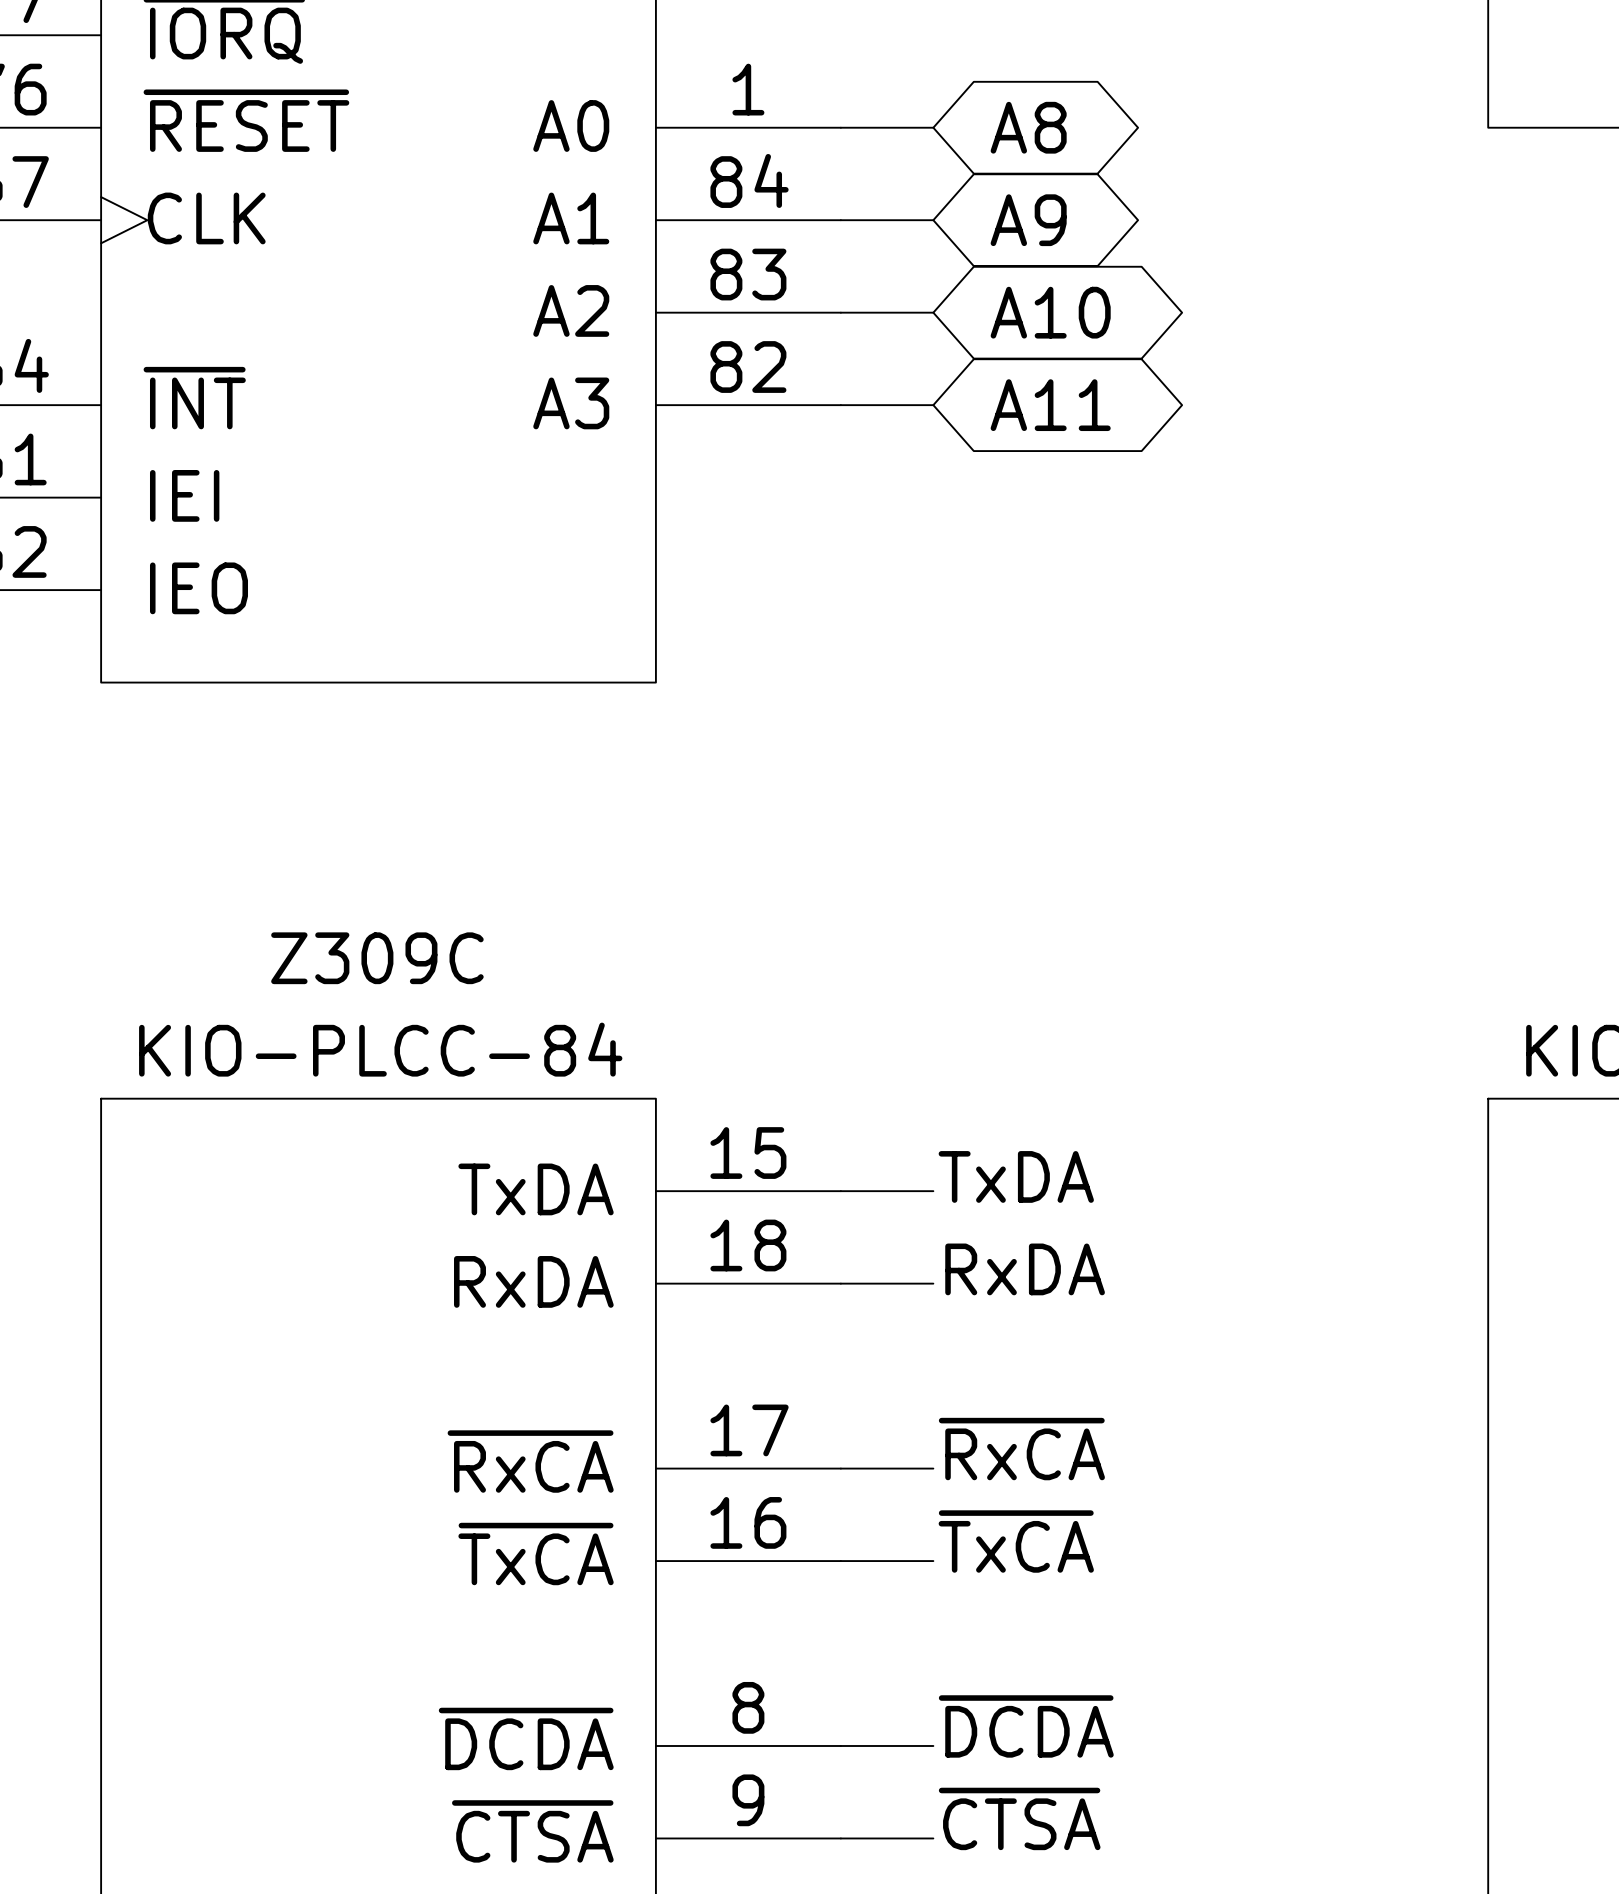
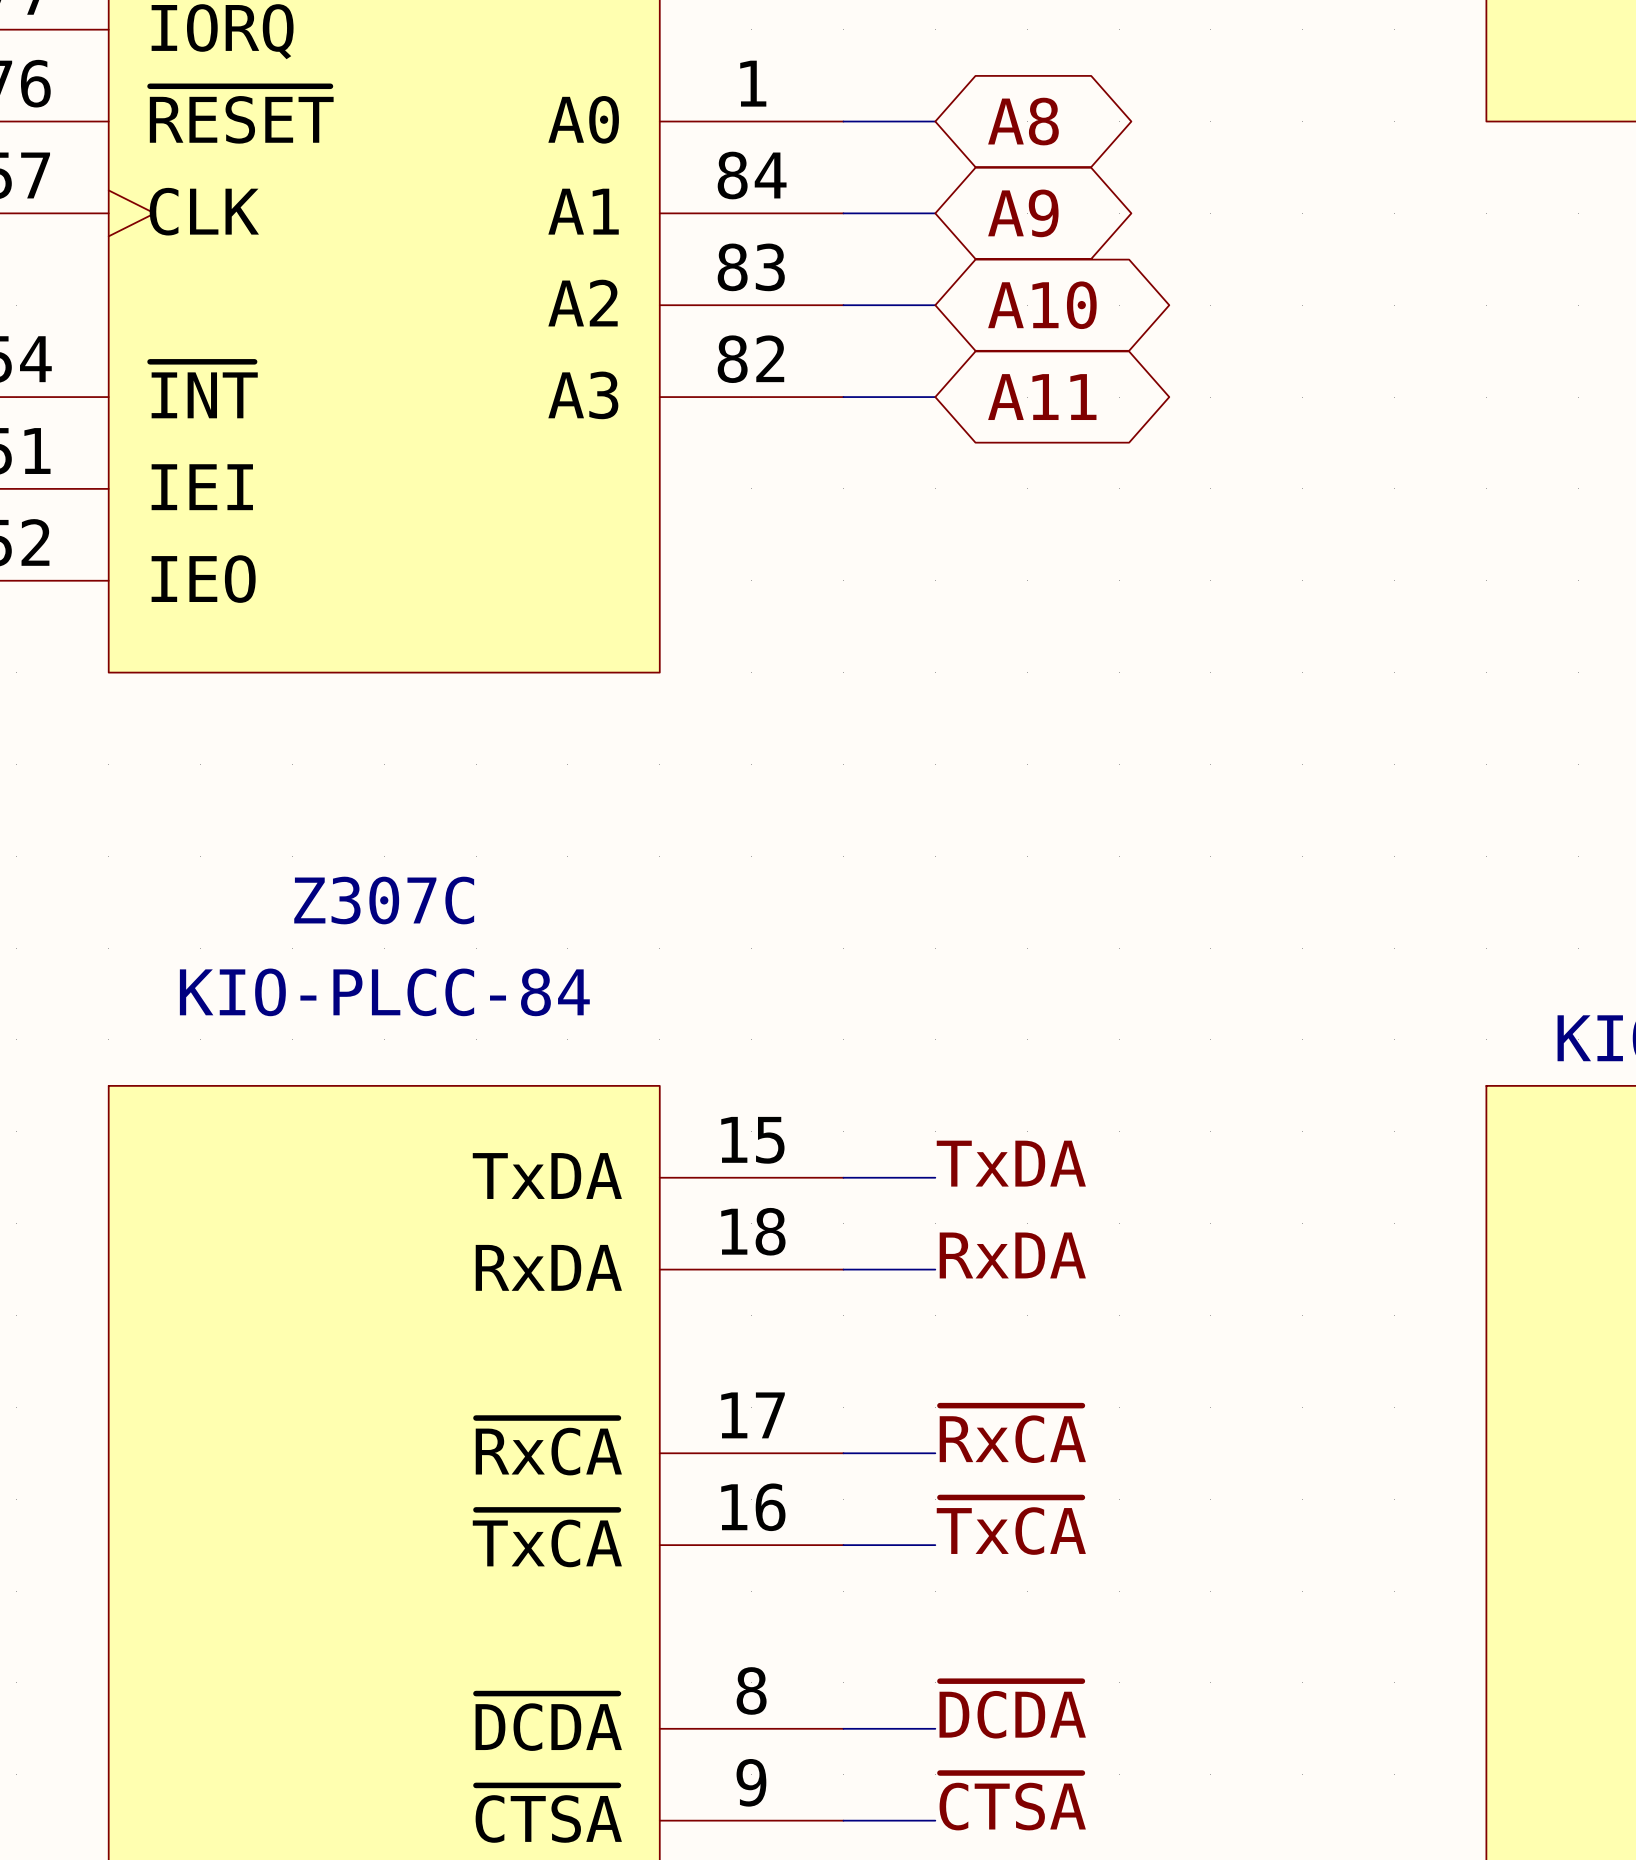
Z309C name: Z309C (377, 958) -> Z307C (384, 900)
Z309C value position: KIO-PLCC-84 (380, 1049) -> KIO-PLCC-84 (384, 992)

